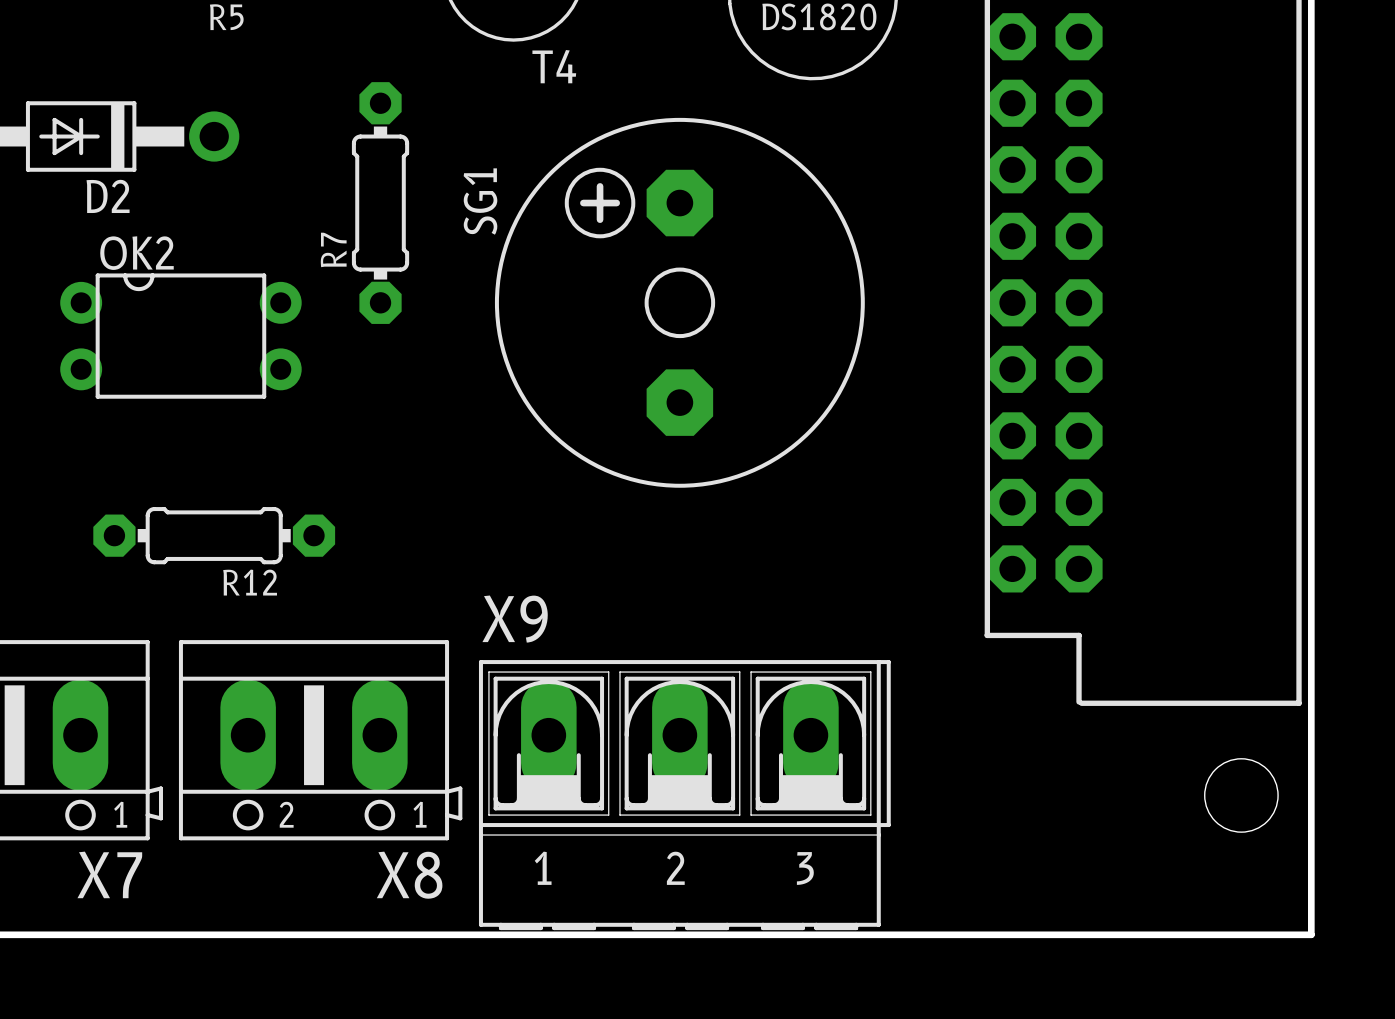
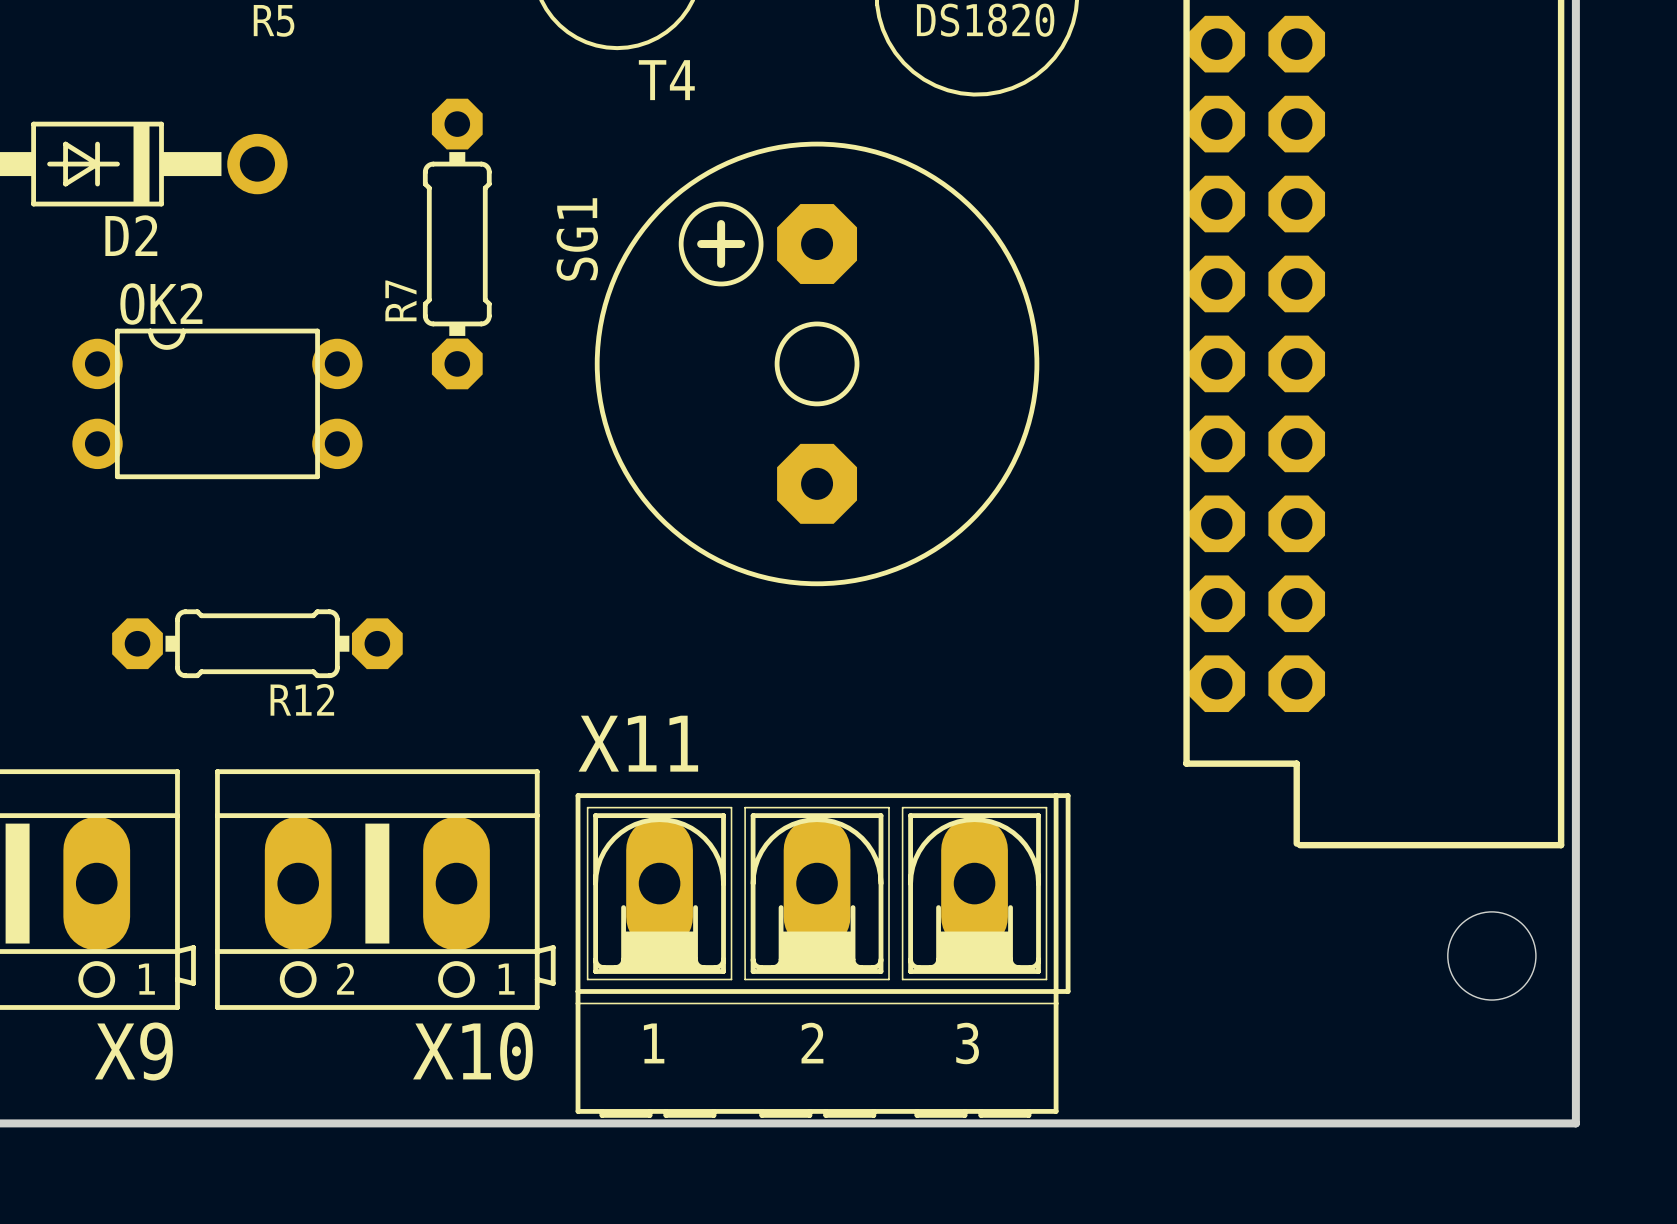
X9 name: X9 (515, 619) -> X11 (638, 743)
X7 name: X7 (109, 874) -> X9 (133, 1051)
X8 name: X8 (409, 875) -> X10 (472, 1051)

